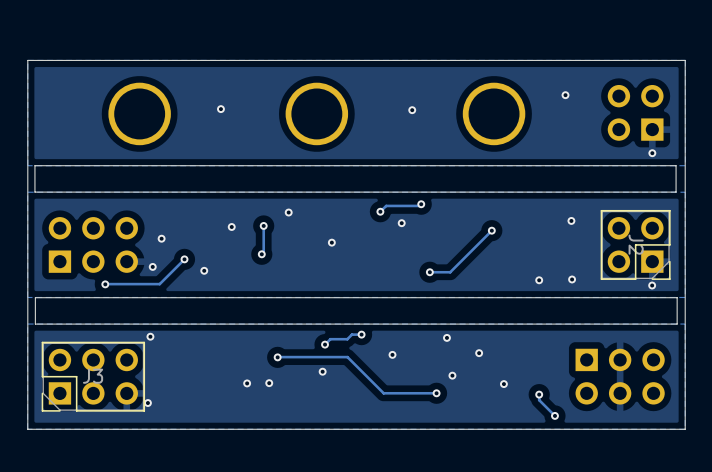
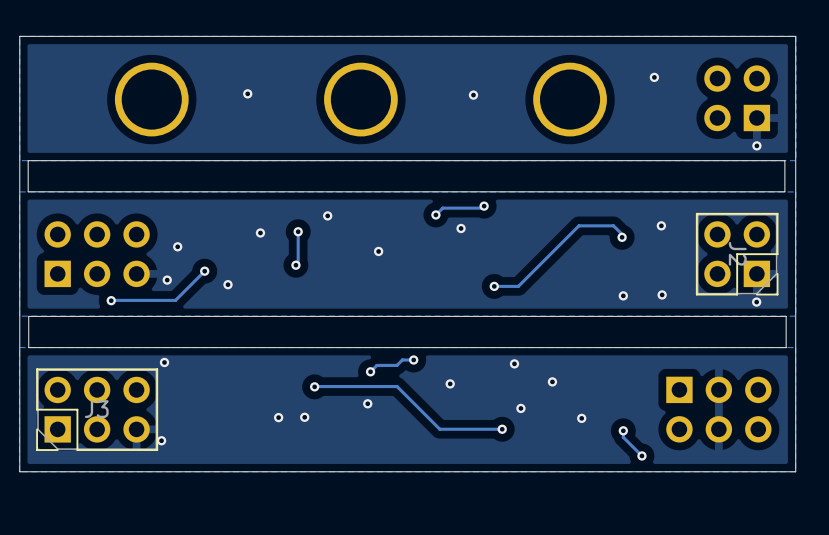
via position: (491, 230) -> (622, 237)
track: none -> (622, 237) (622, 234) (613, 225) (578, 225) (567, 237)

